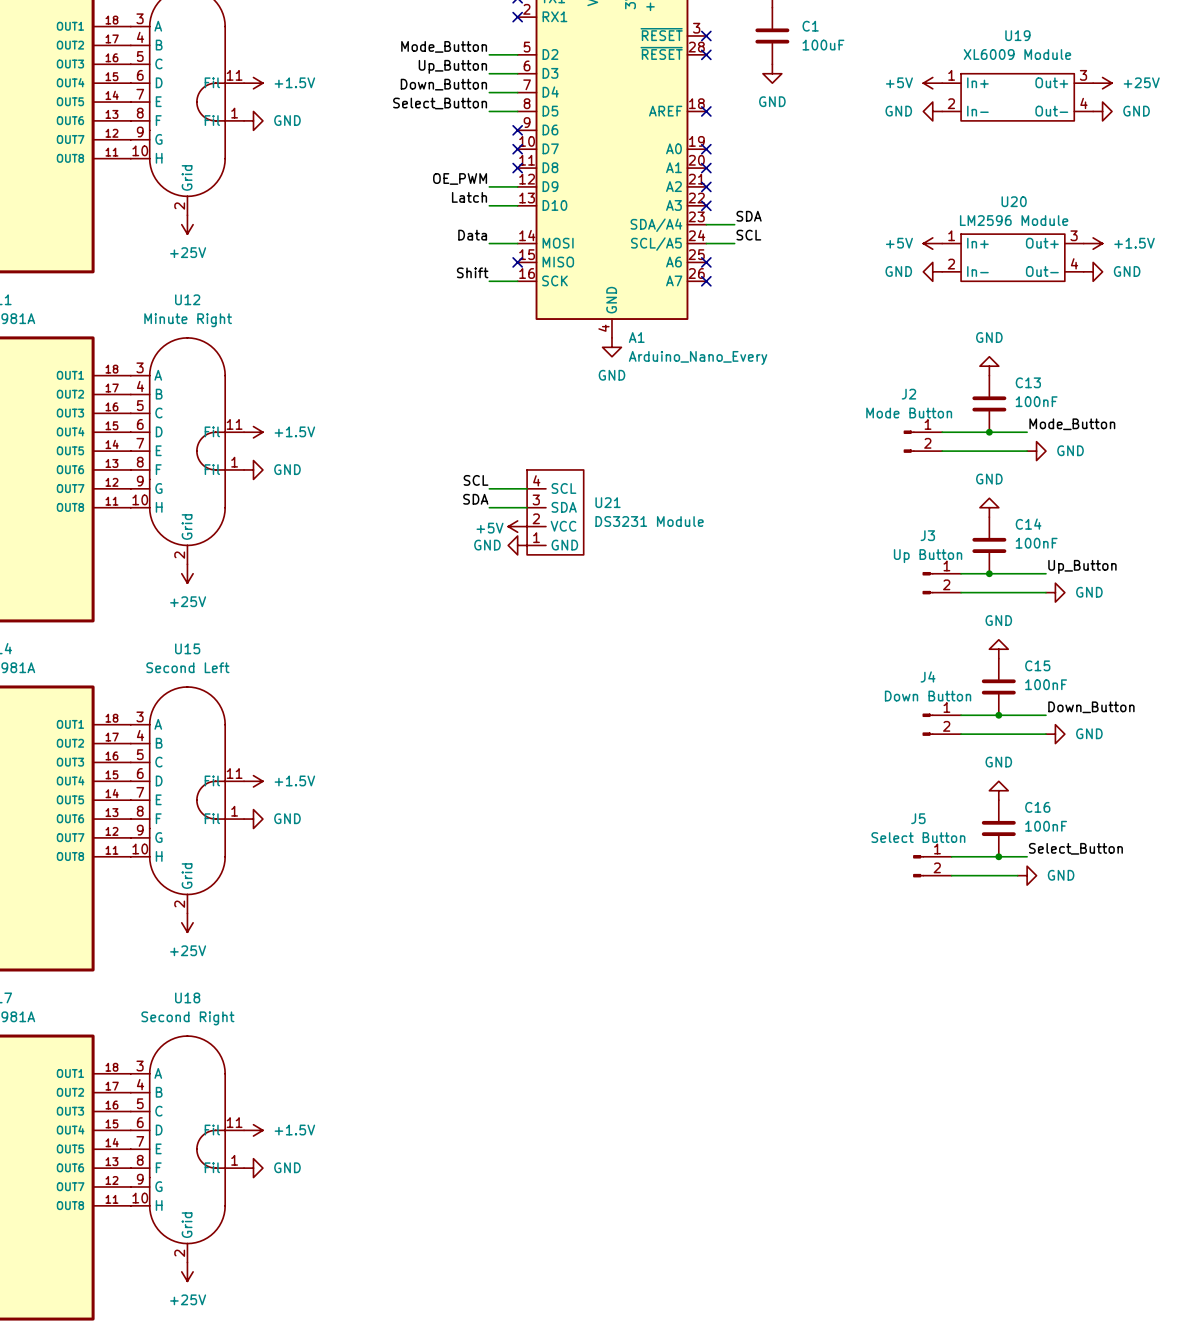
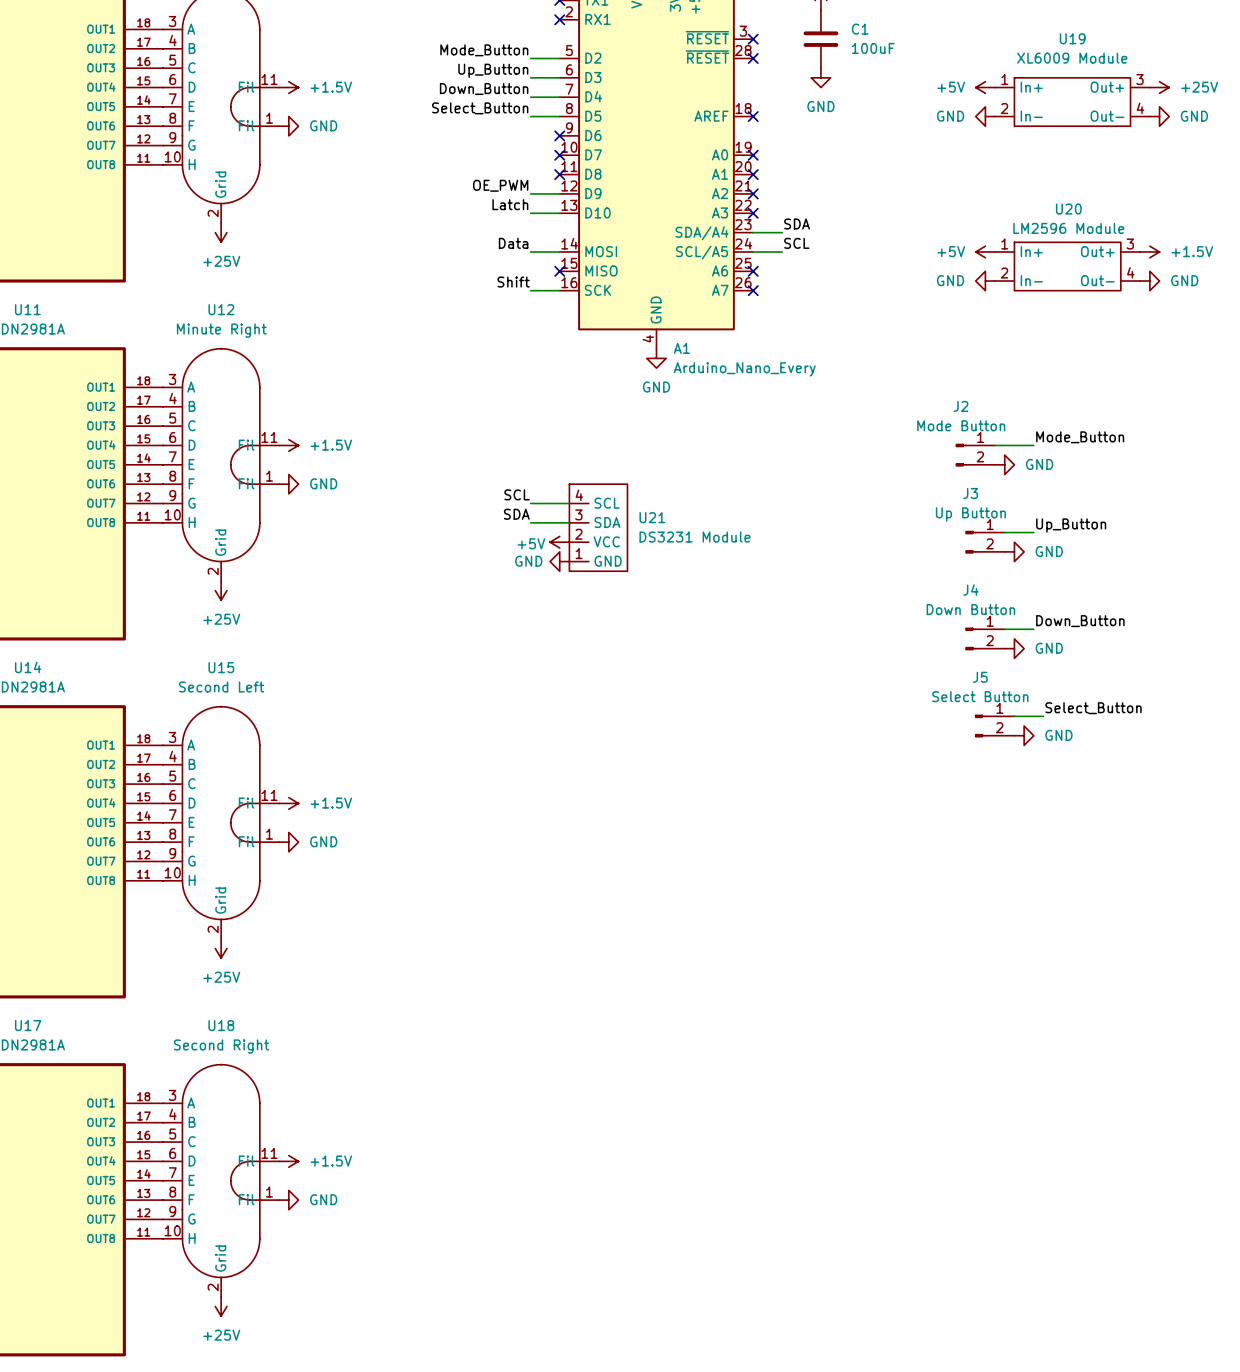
power symbol: GND (989, 366) -> none
C13: 100nF (989, 403) -> none
label position: Mode_Button (1072, 424) -> Mode_Button (1080, 437)
wire: (979, 432) (1027, 432) -> none
junction: (989, 432) -> none
wire: (942, 451) (1027, 451) -> none
power symbol: none -> GND (1004, 464)
power symbol: GND (1036, 451) -> none
power symbol: GND (989, 507) -> none
wire: none -> (1004, 532) (1033, 532)
power symbol: none -> GND (1014, 551)
C14: 100nF (989, 545) -> none
label position: Up_Button (1082, 566) -> Up_Button (1071, 525)
wire: (961, 573) (1045, 573) -> none
junction: (989, 573) -> none
J3 position: (941, 583) -> (985, 542)
wire: (961, 592) (1045, 592) -> none
power symbol: GND (1055, 592) -> none
wire: none -> (1004, 629) (1033, 629)
power symbol: none -> GND (1014, 648)
power symbol: GND (998, 649) -> none
C15: 100nF (998, 686) -> none
wire: none -> (1014, 716) (1043, 716)
label position: Down_Button (1091, 707) -> Down_Button (1080, 621)
wire: (961, 715) (1045, 715) -> none
power symbol: none -> GND (1024, 735)
junction: (998, 715) -> none
J4 position: (941, 724) -> (985, 638)
wire: (961, 734) (1045, 734) -> none
power symbol: GND (1055, 734) -> none
power symbol: GND (998, 790) -> none
C16: 100nF (998, 828) -> none
label position: Select_Button (1075, 848) -> Select_Button (1093, 708)
wire: (951, 856) (1027, 856) -> none
junction: (998, 856) -> none
J5 position: (932, 866) -> (994, 726)
wire: (951, 875) (1017, 875) -> none
power symbol: GND (1027, 875) -> none

